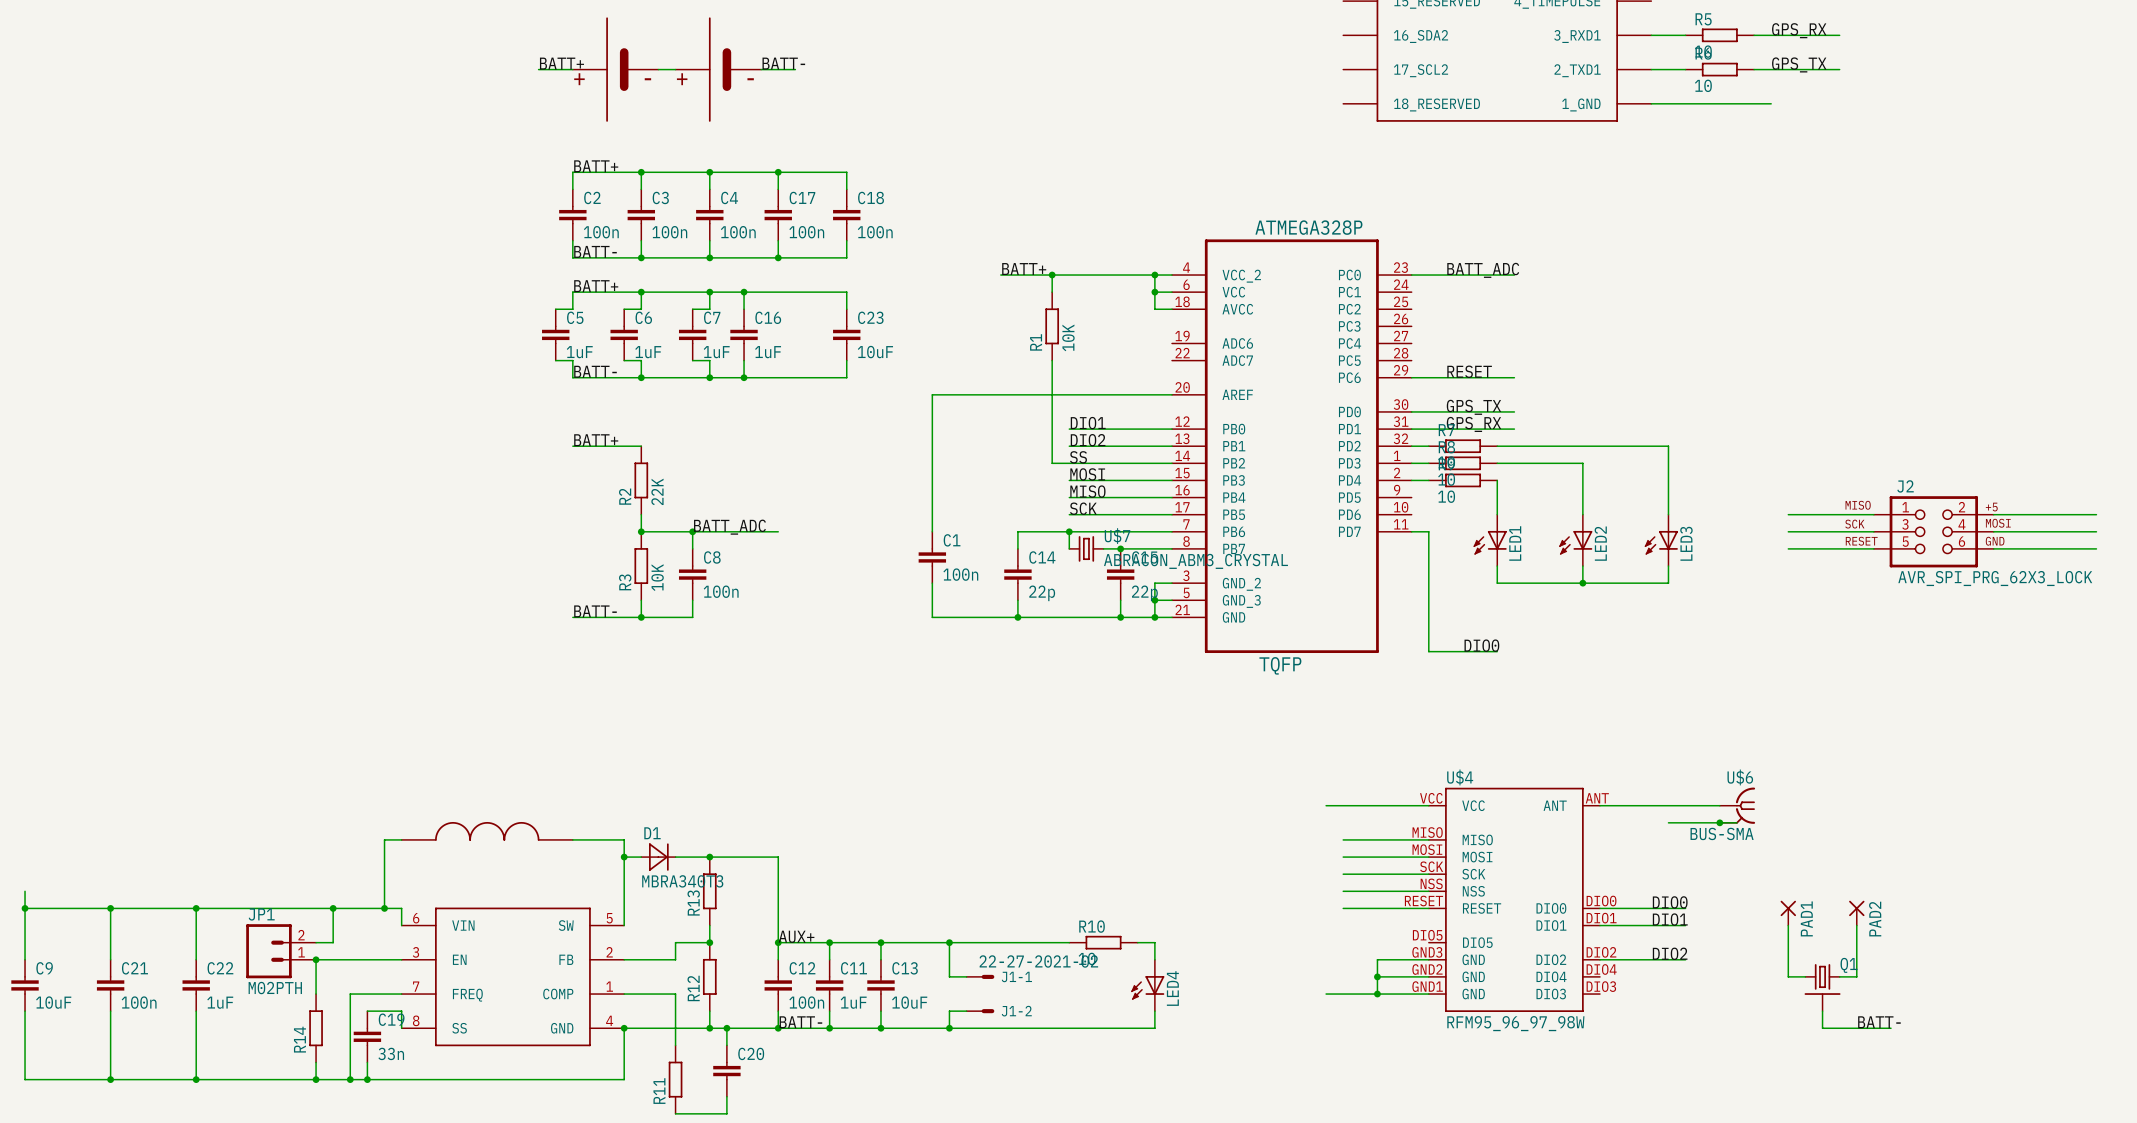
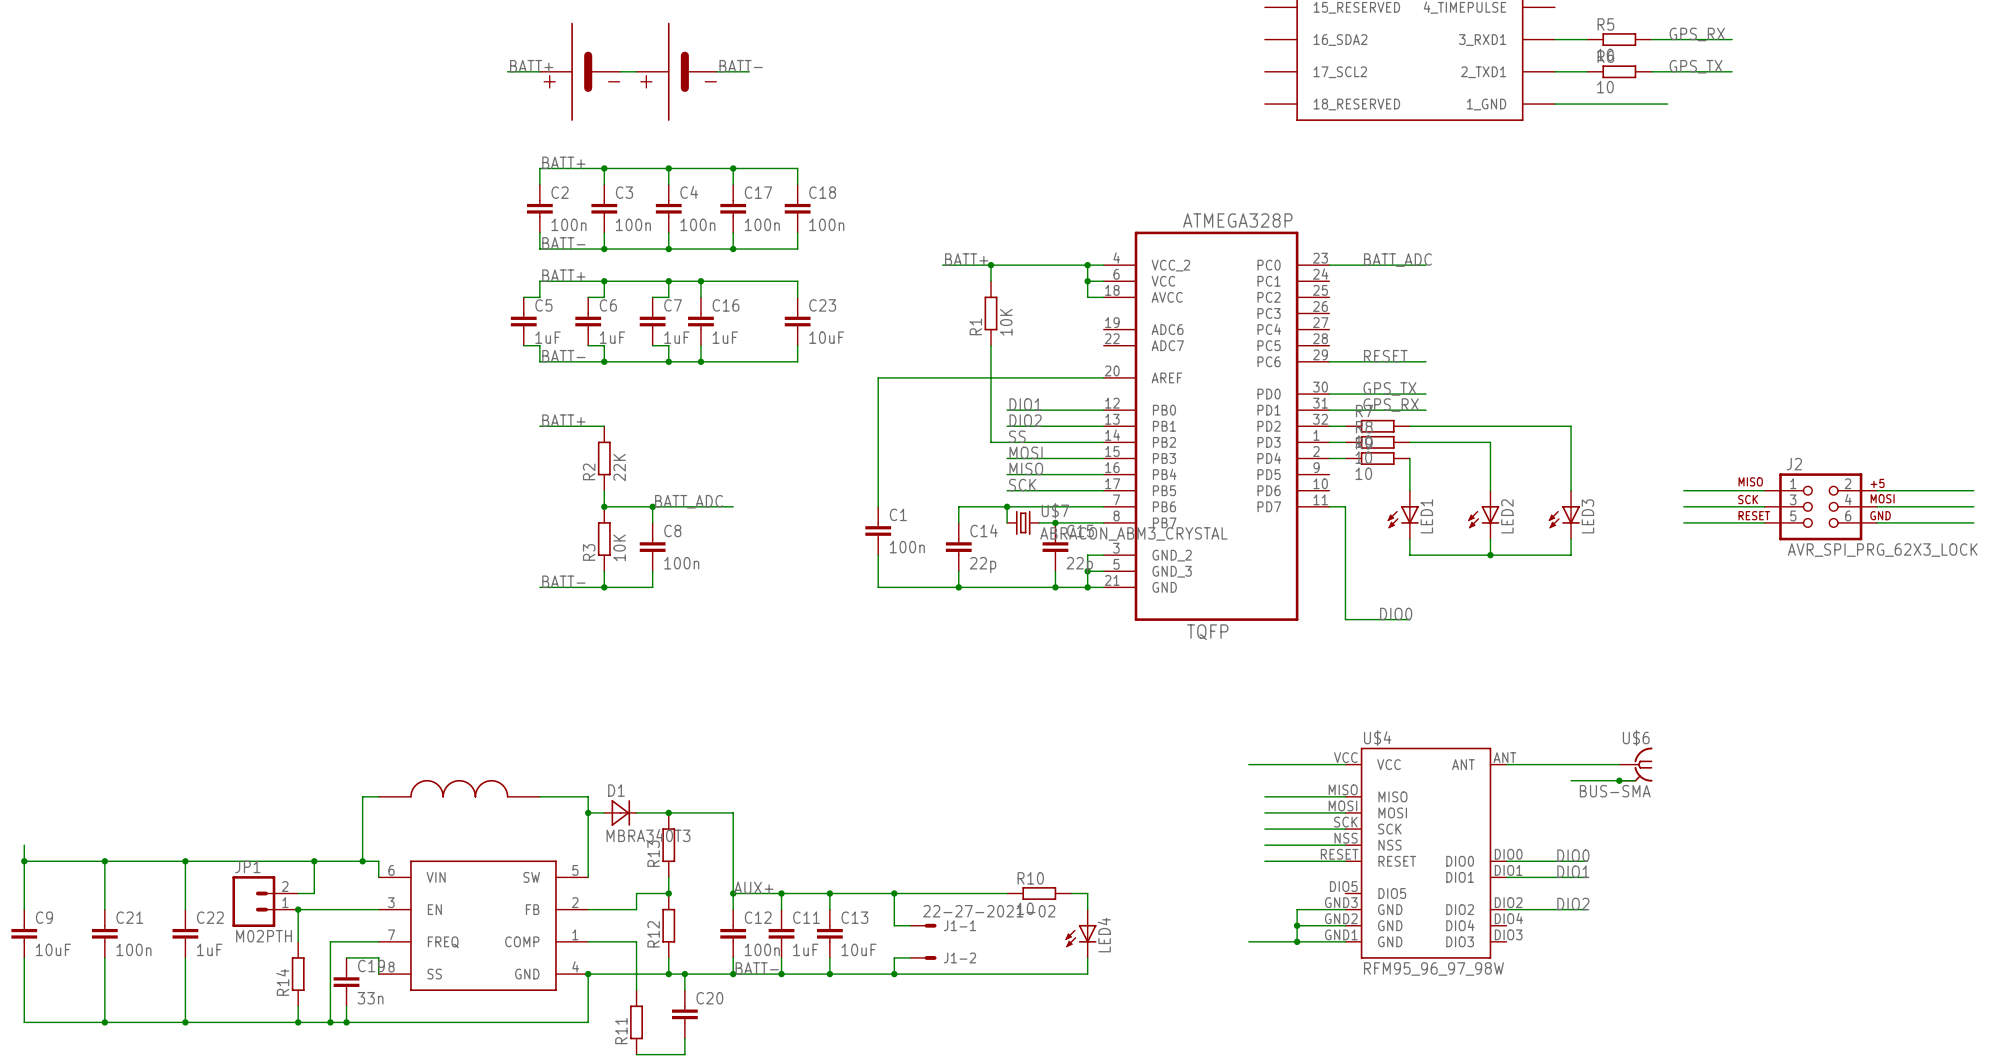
PAD1: (1788, 913) -> none
PAD2: (1856, 913) -> none
wire: (1788, 925) (1788, 976) (1805, 976) -> none
wire: (1856, 925) (1856, 976) (1839, 976) -> none
Q1: (1822, 987) -> none
wire: (1822, 1011) (1822, 1028) (1891, 1028) -> none
label: BATT- (1879, 1022) -> none

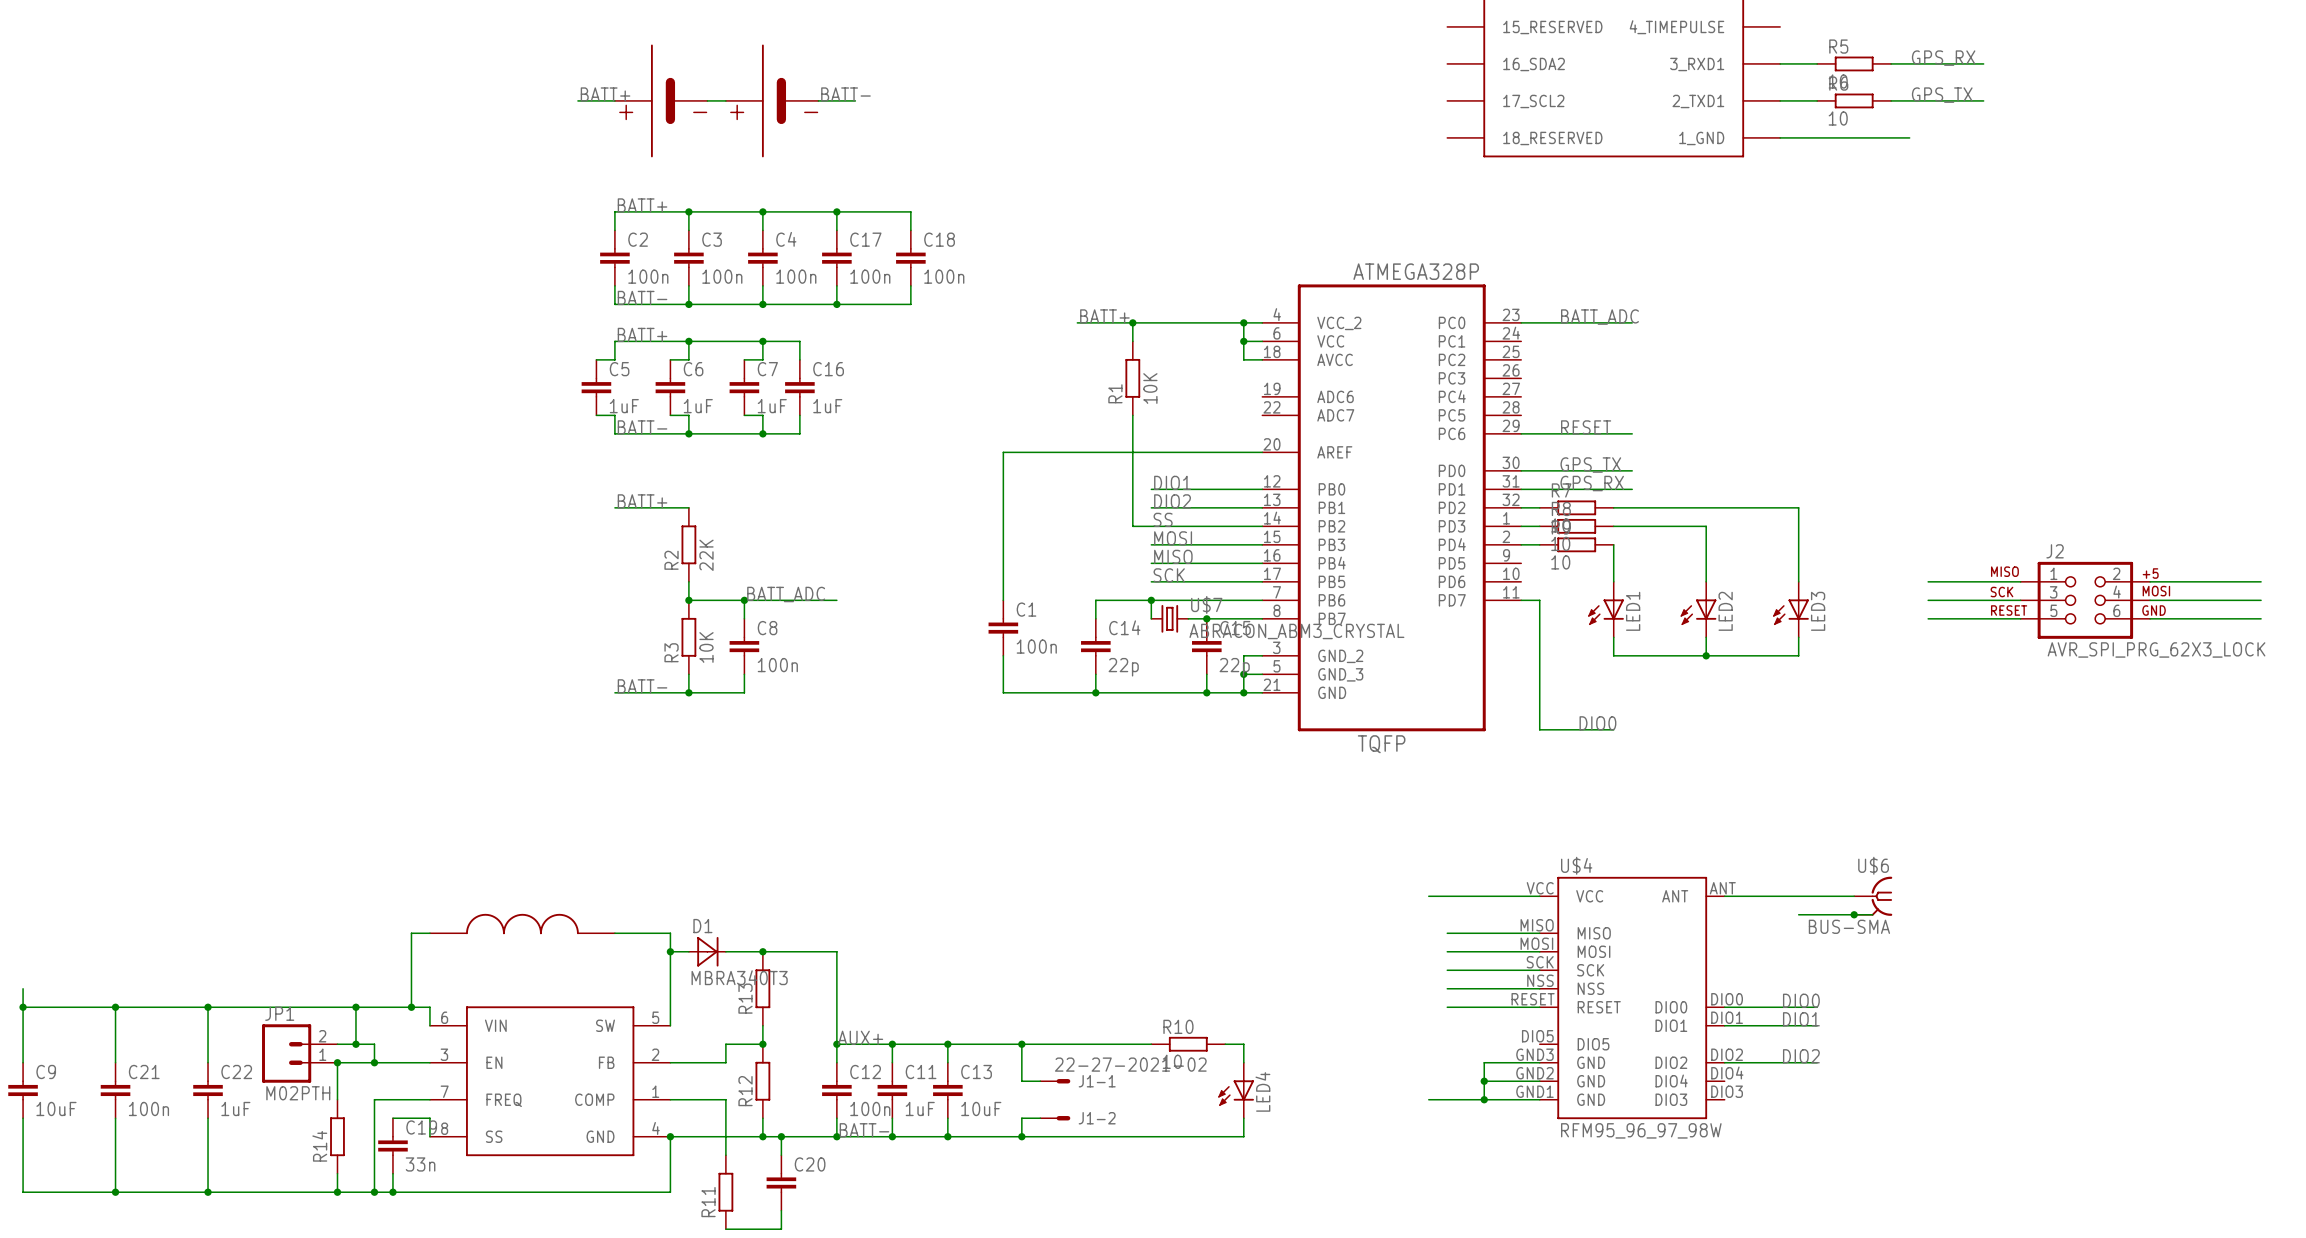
wire: (700, 281) (797, 281) (797, 297) -> none
junction: (700, 281) -> none
C23: 10uF (797, 321) -> none
wire: (797, 345) (797, 361) (700, 361) -> none
junction: (700, 361) -> none
wire: none -> (355, 1044) (374, 1044) (374, 1062)
junction: none -> (355, 1044)
junction: none -> (374, 1062)

